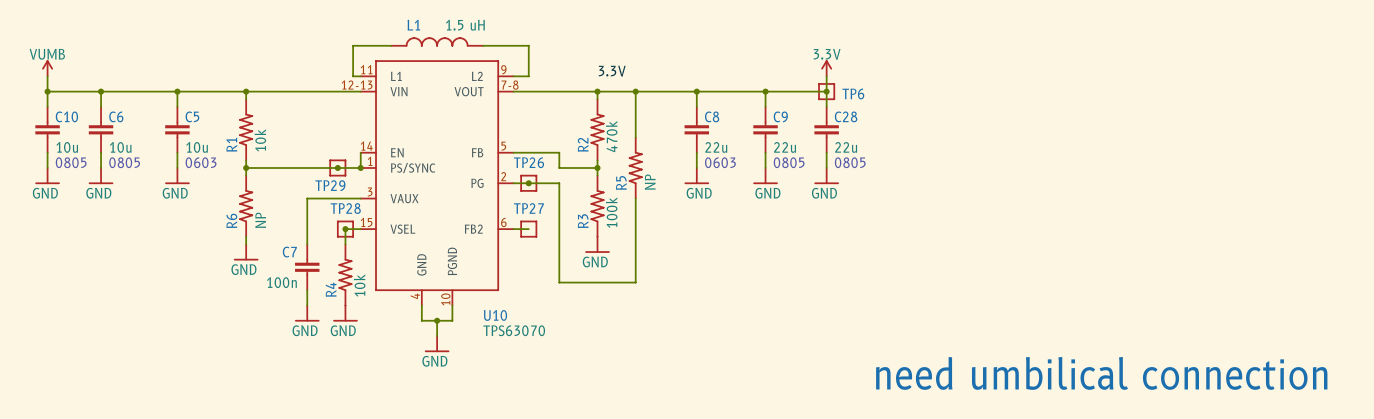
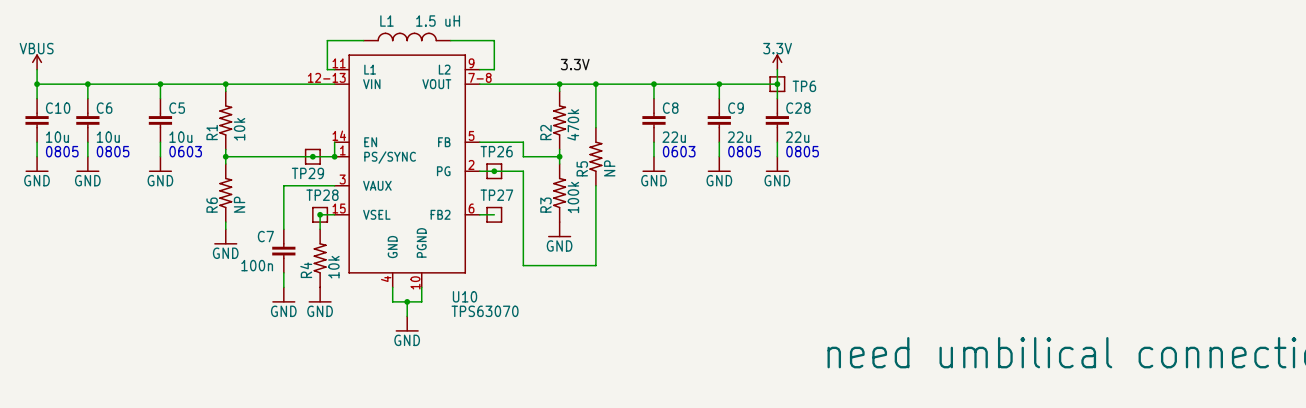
power symbol: VUMB (47, 68) -> VBUS (37, 62)

